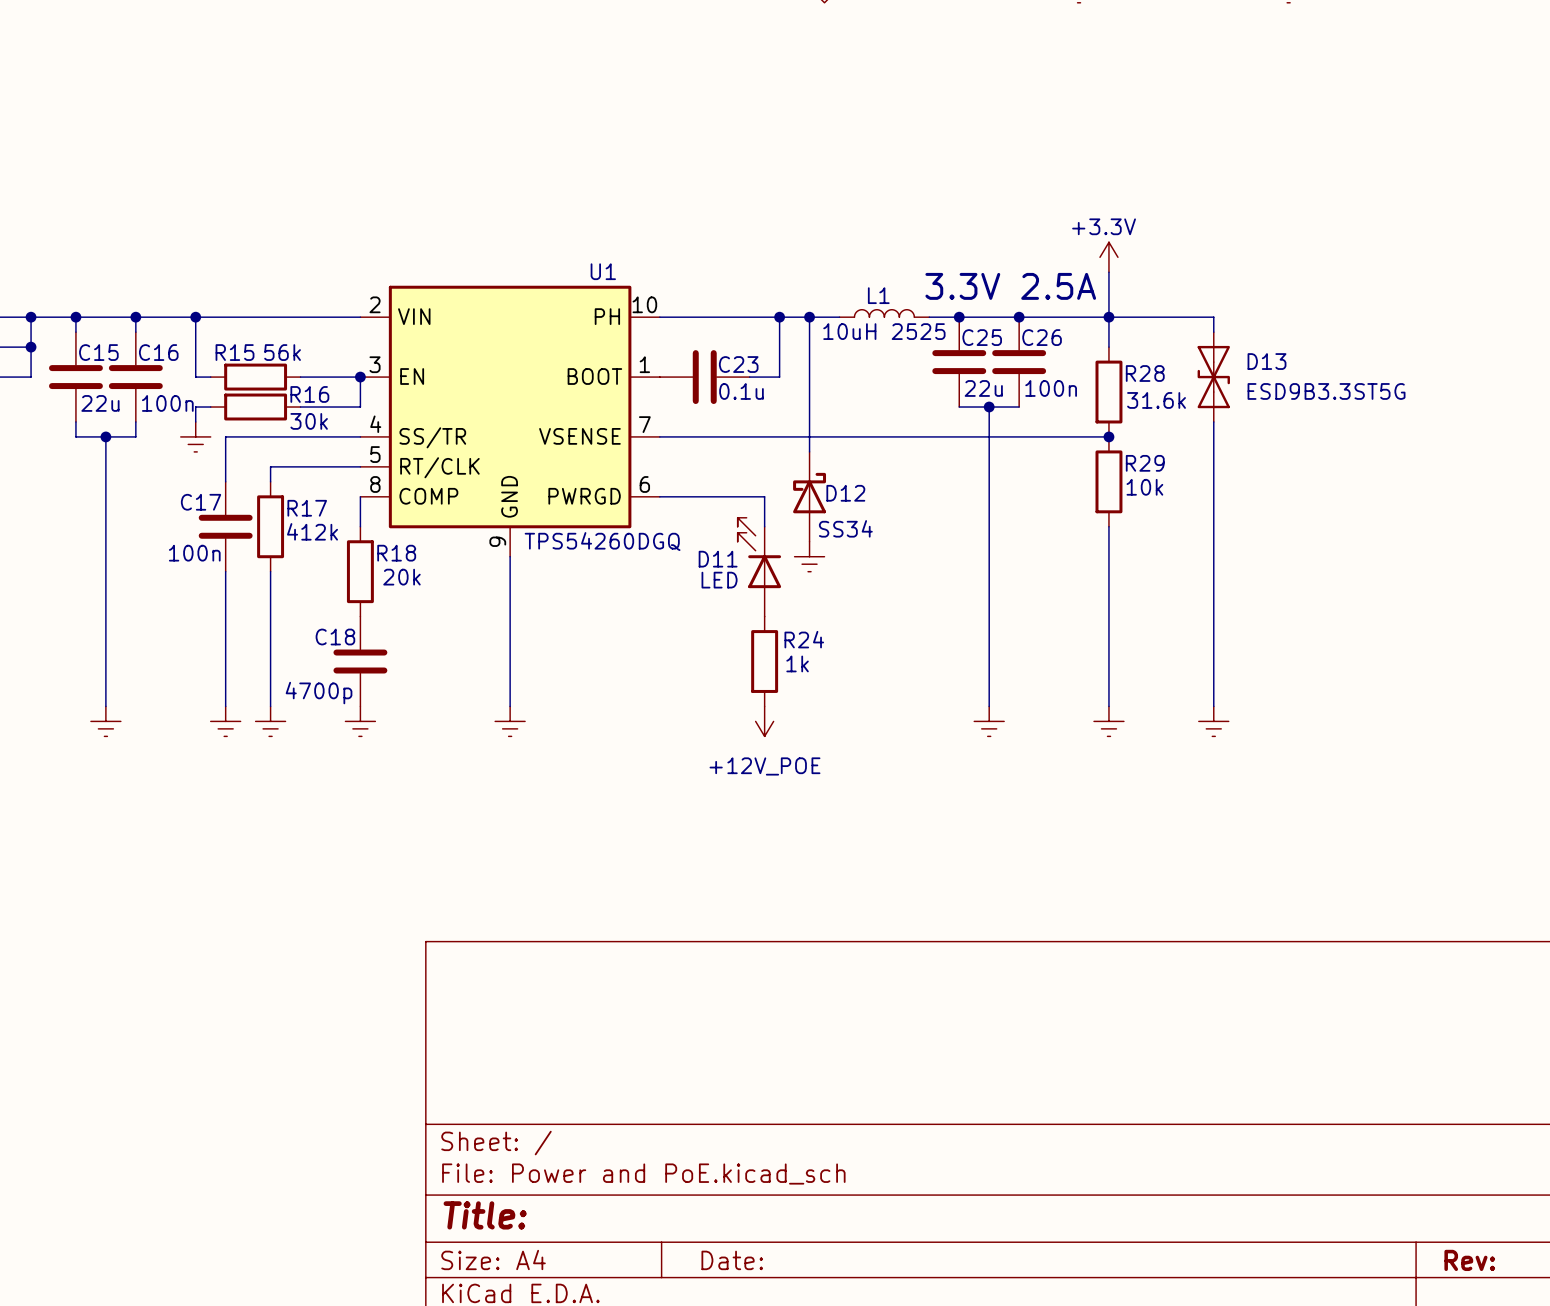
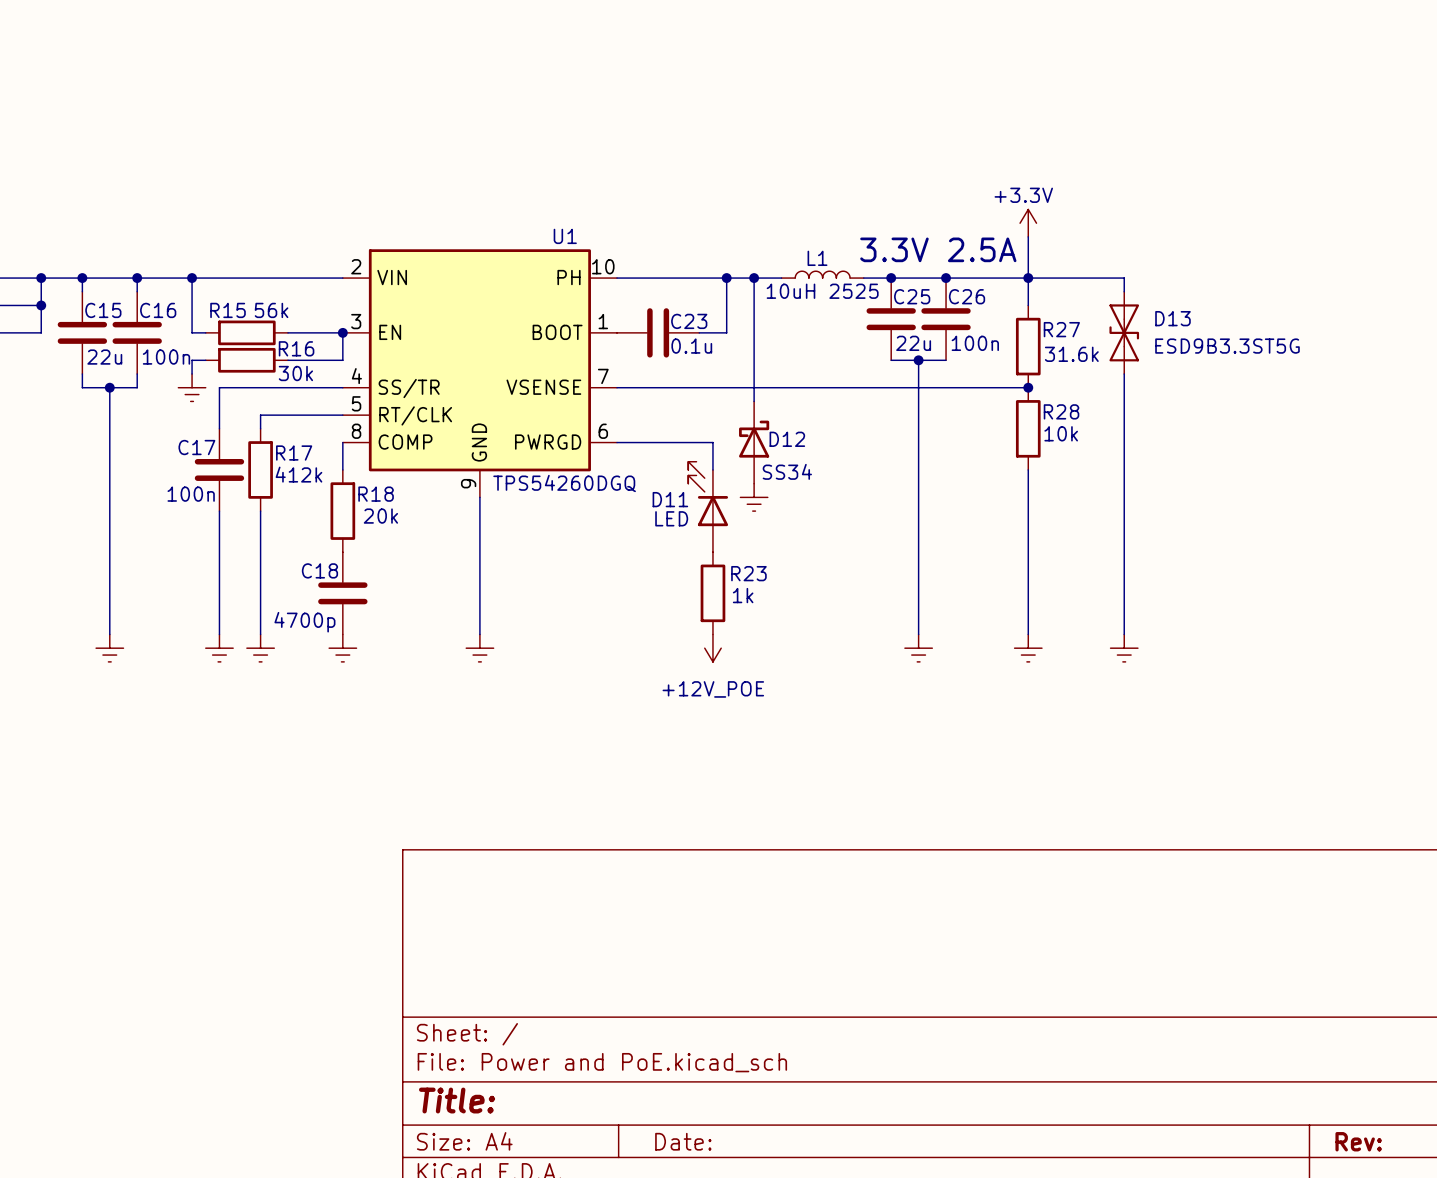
R28 name: R28 (1145, 373) -> R27 (1061, 329)
R29 name: R29 (1145, 463) -> R28 (1061, 411)
R24 name: R24 (804, 639) -> R23 (748, 573)

